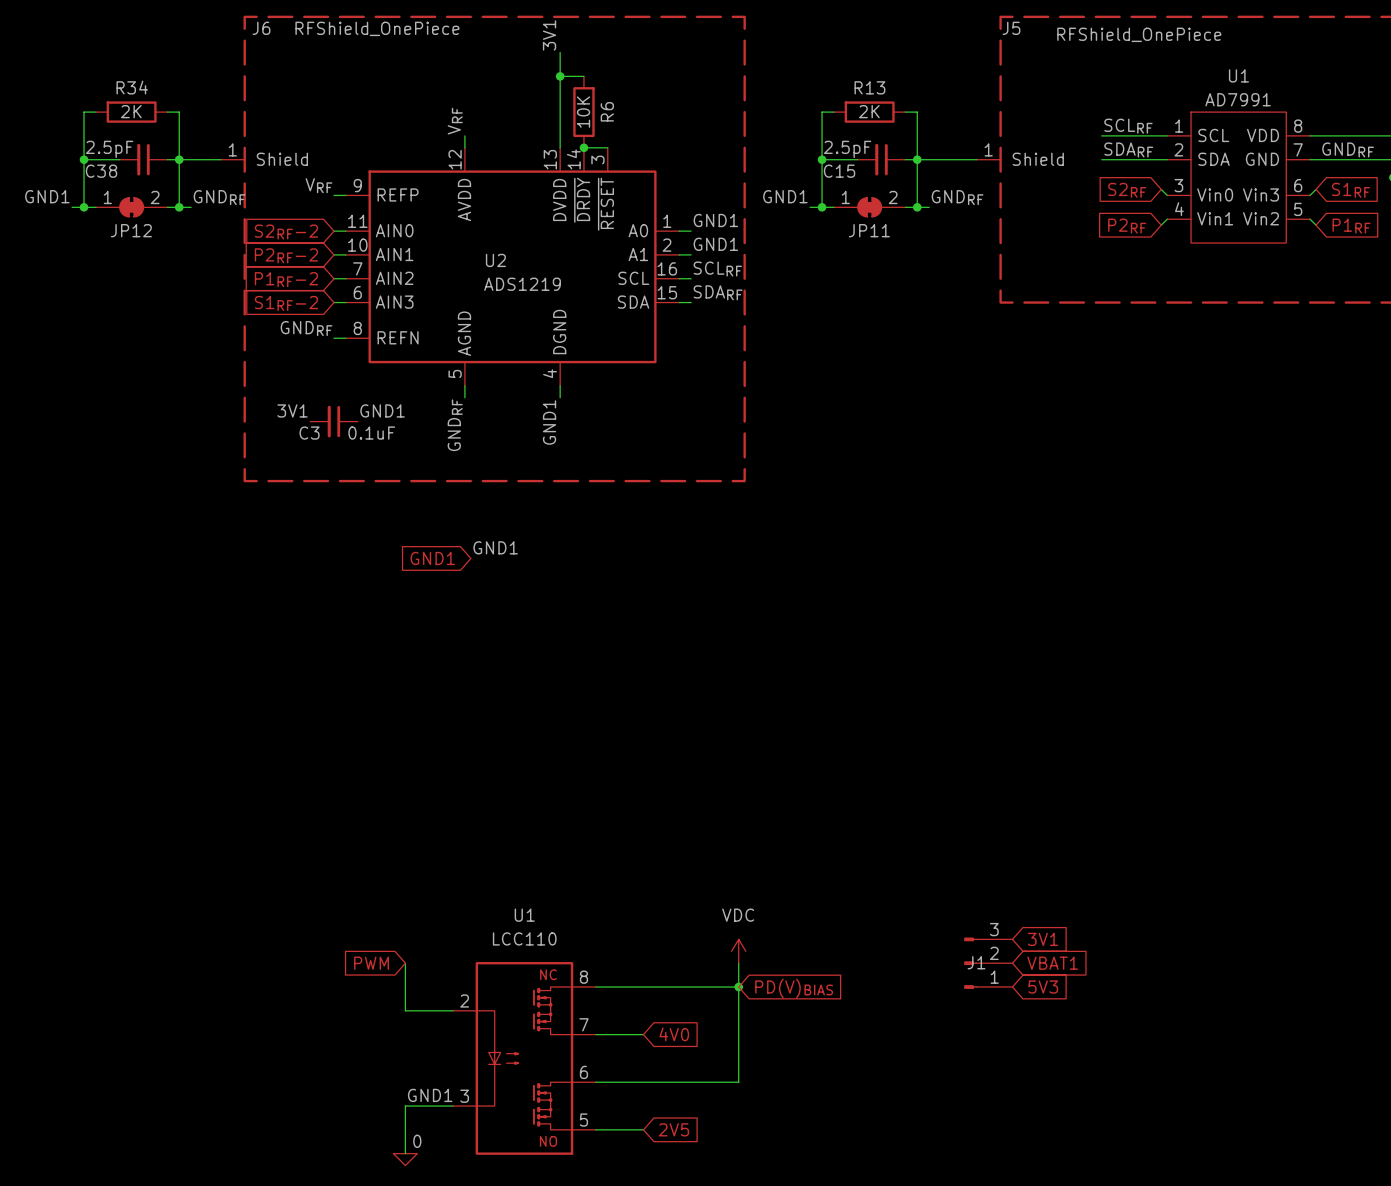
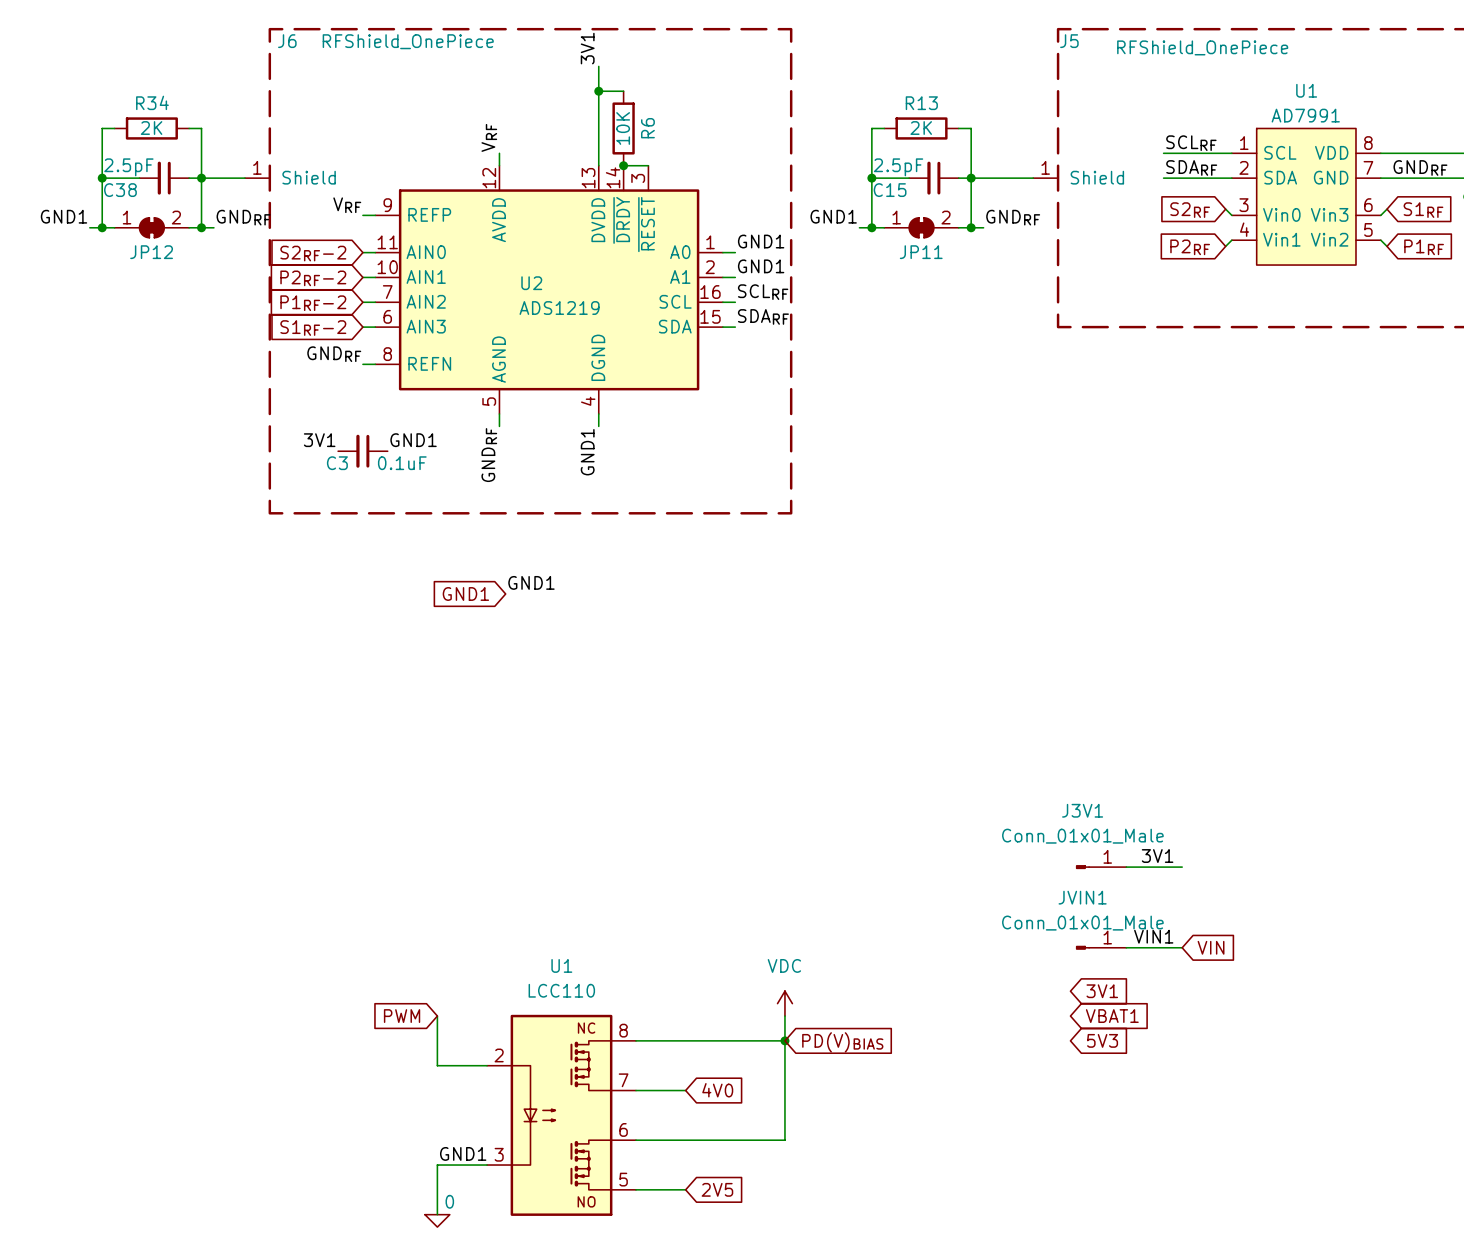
label: none -> 3V1 (1157, 856)
J3V1: none -> Conn_01x01_Male (1101, 867)
wire: none -> (1126, 867) (1182, 867)
label: none -> VIN1 (1153, 936)
JVIN1: none -> Conn_01x01_Male (1101, 947)
wire: none -> (1126, 947) (1182, 947)
global label: none -> VIN (1211, 947)
J1: (988, 963) -> none

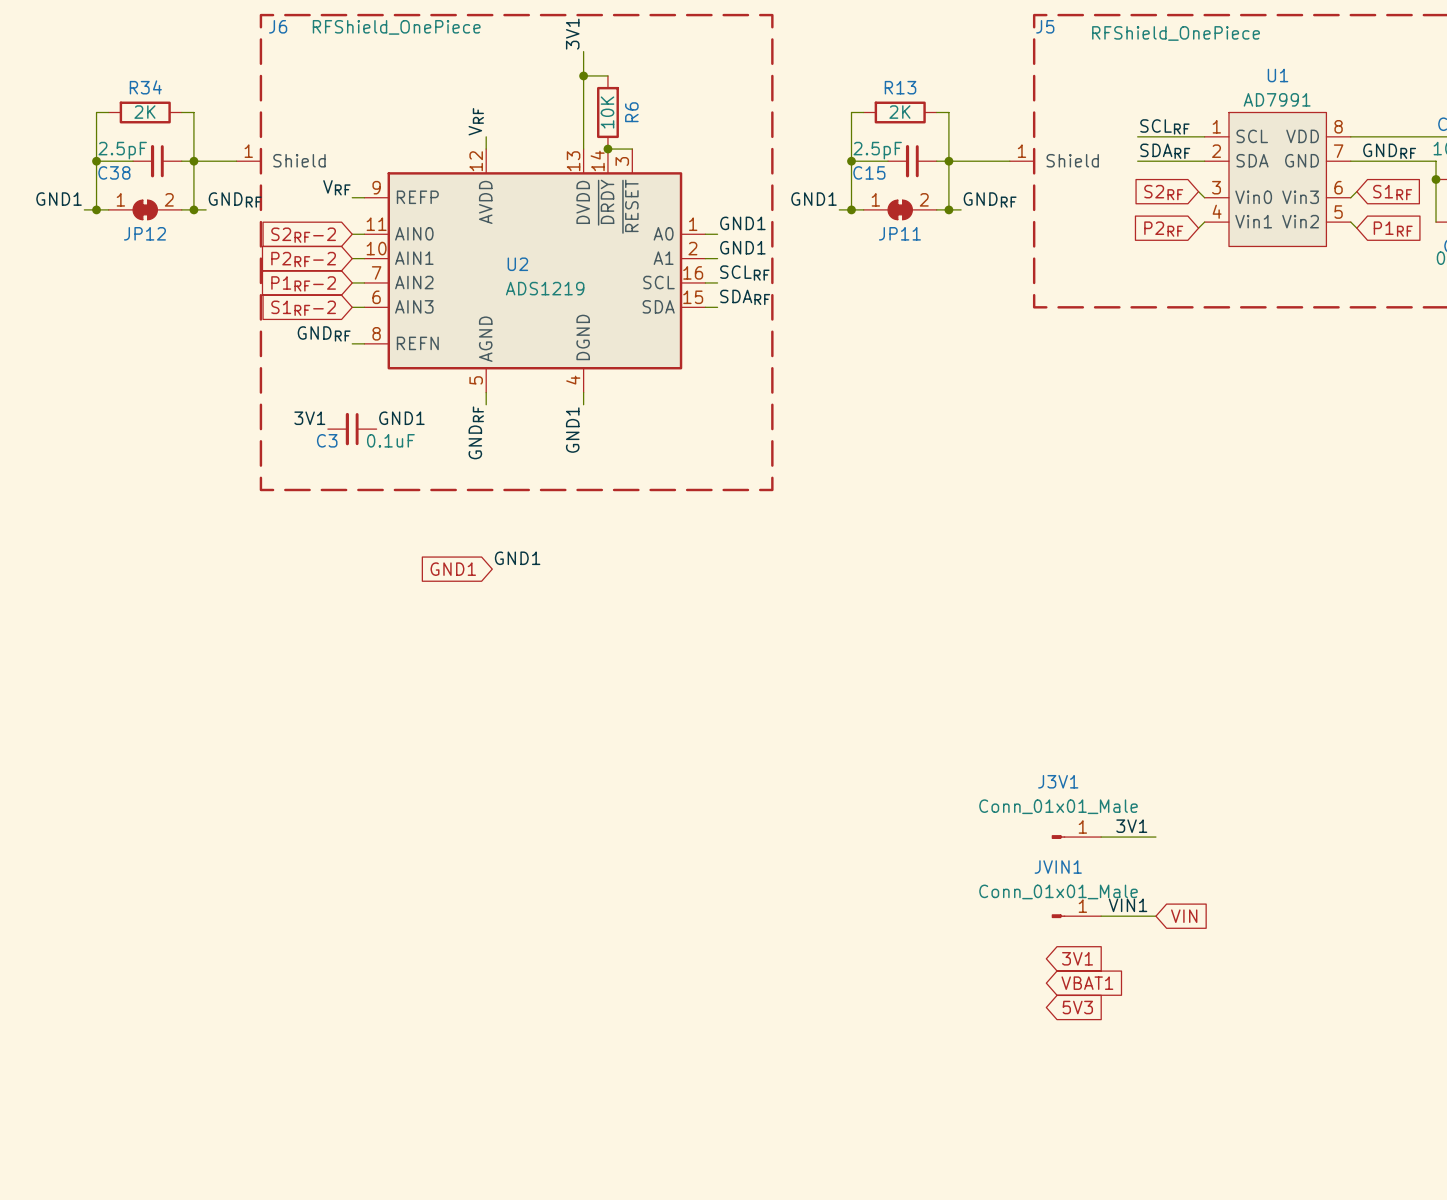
power symbol: VDC (784, 1003) -> none
global label: PWM (402, 1016) -> none
wire: (437, 1016) (437, 1065) (487, 1065) -> none
wire: (784, 1016) (784, 1140) (636, 1140) -> none
wire: (636, 1040) (784, 1040) -> none
junction: (784, 1040) -> none
global label: PD(V)BIAS (842, 1042) -> none
wire: (636, 1090) (685, 1090) -> none
global label: 4V0 (717, 1090) -> none
U1: LCC110 (561, 1115) -> none
label: GND1 (463, 1153) -> none
wire: (487, 1165) (437, 1165) (437, 1214) -> none
wire: (636, 1189) (685, 1189) -> none
global label: 2V5 (717, 1189) -> none
power symbol: 0 (437, 1220) -> none

